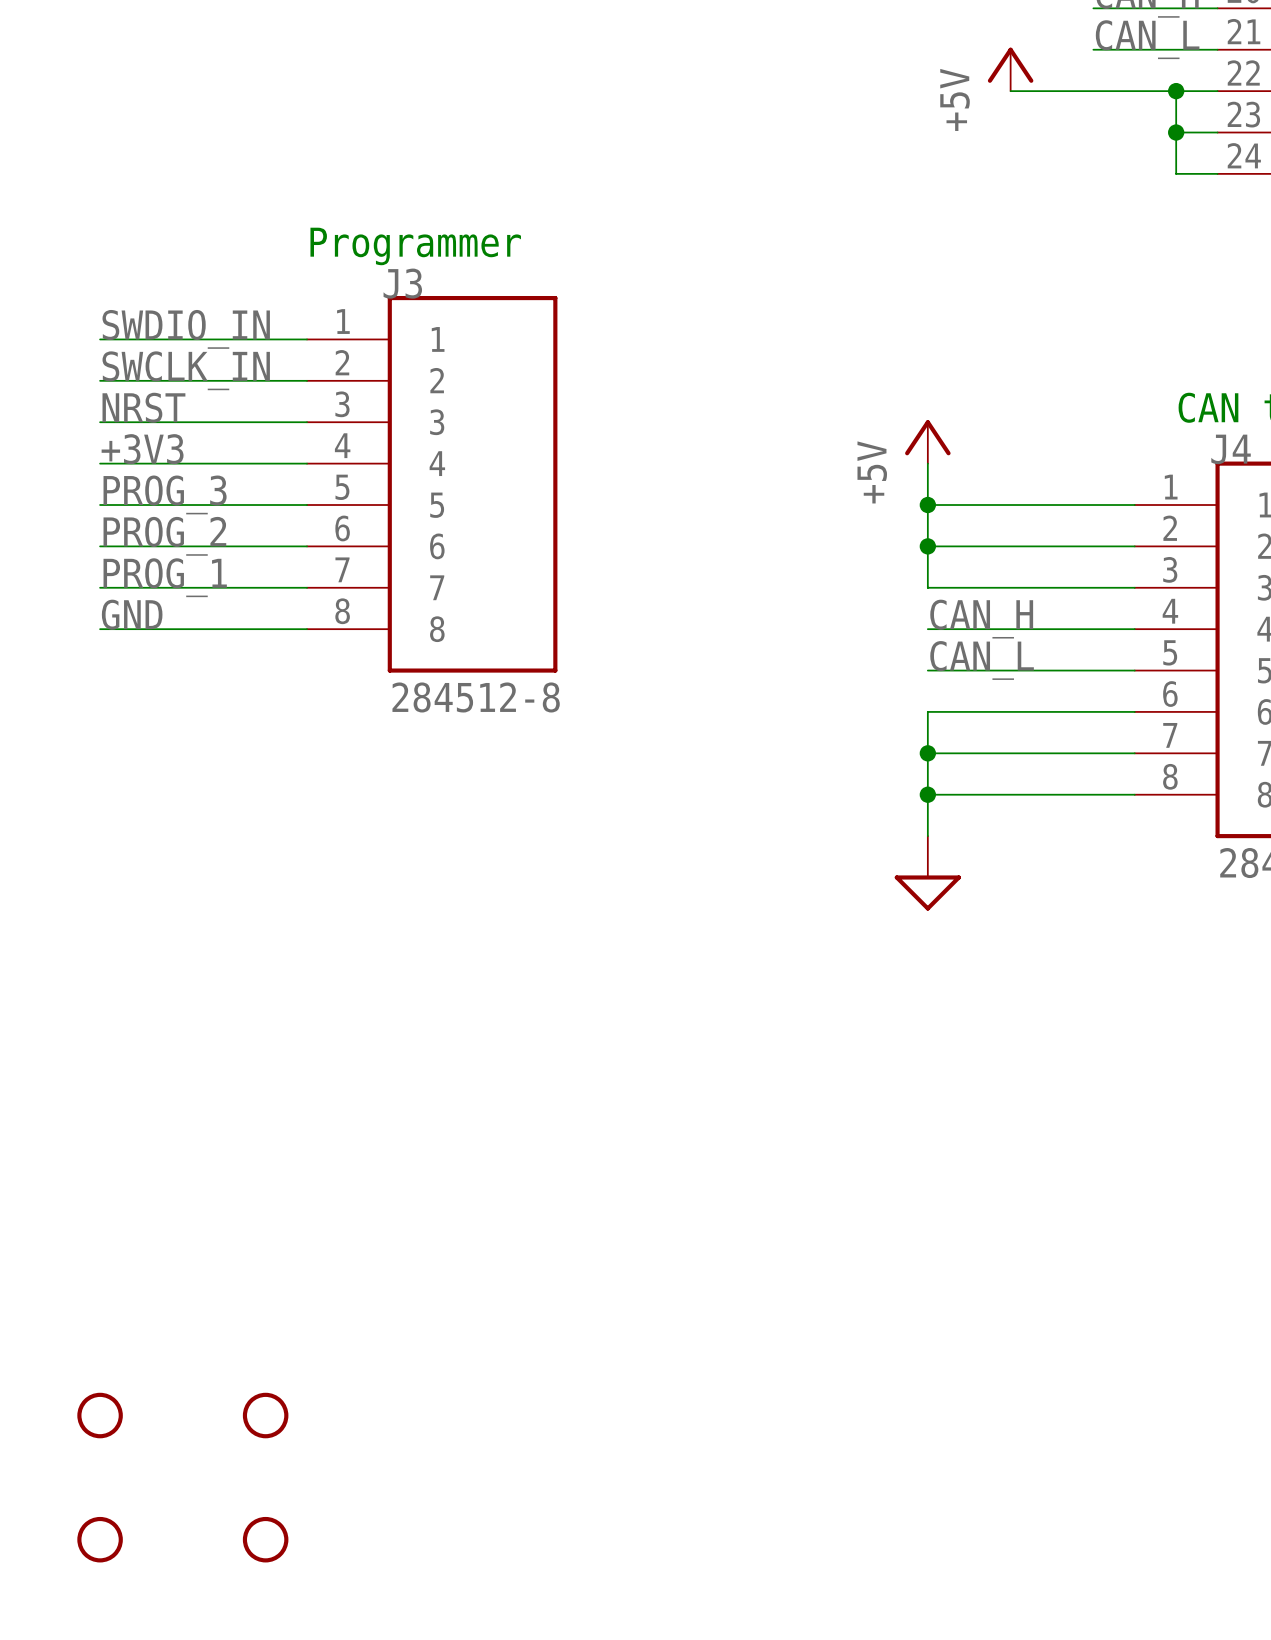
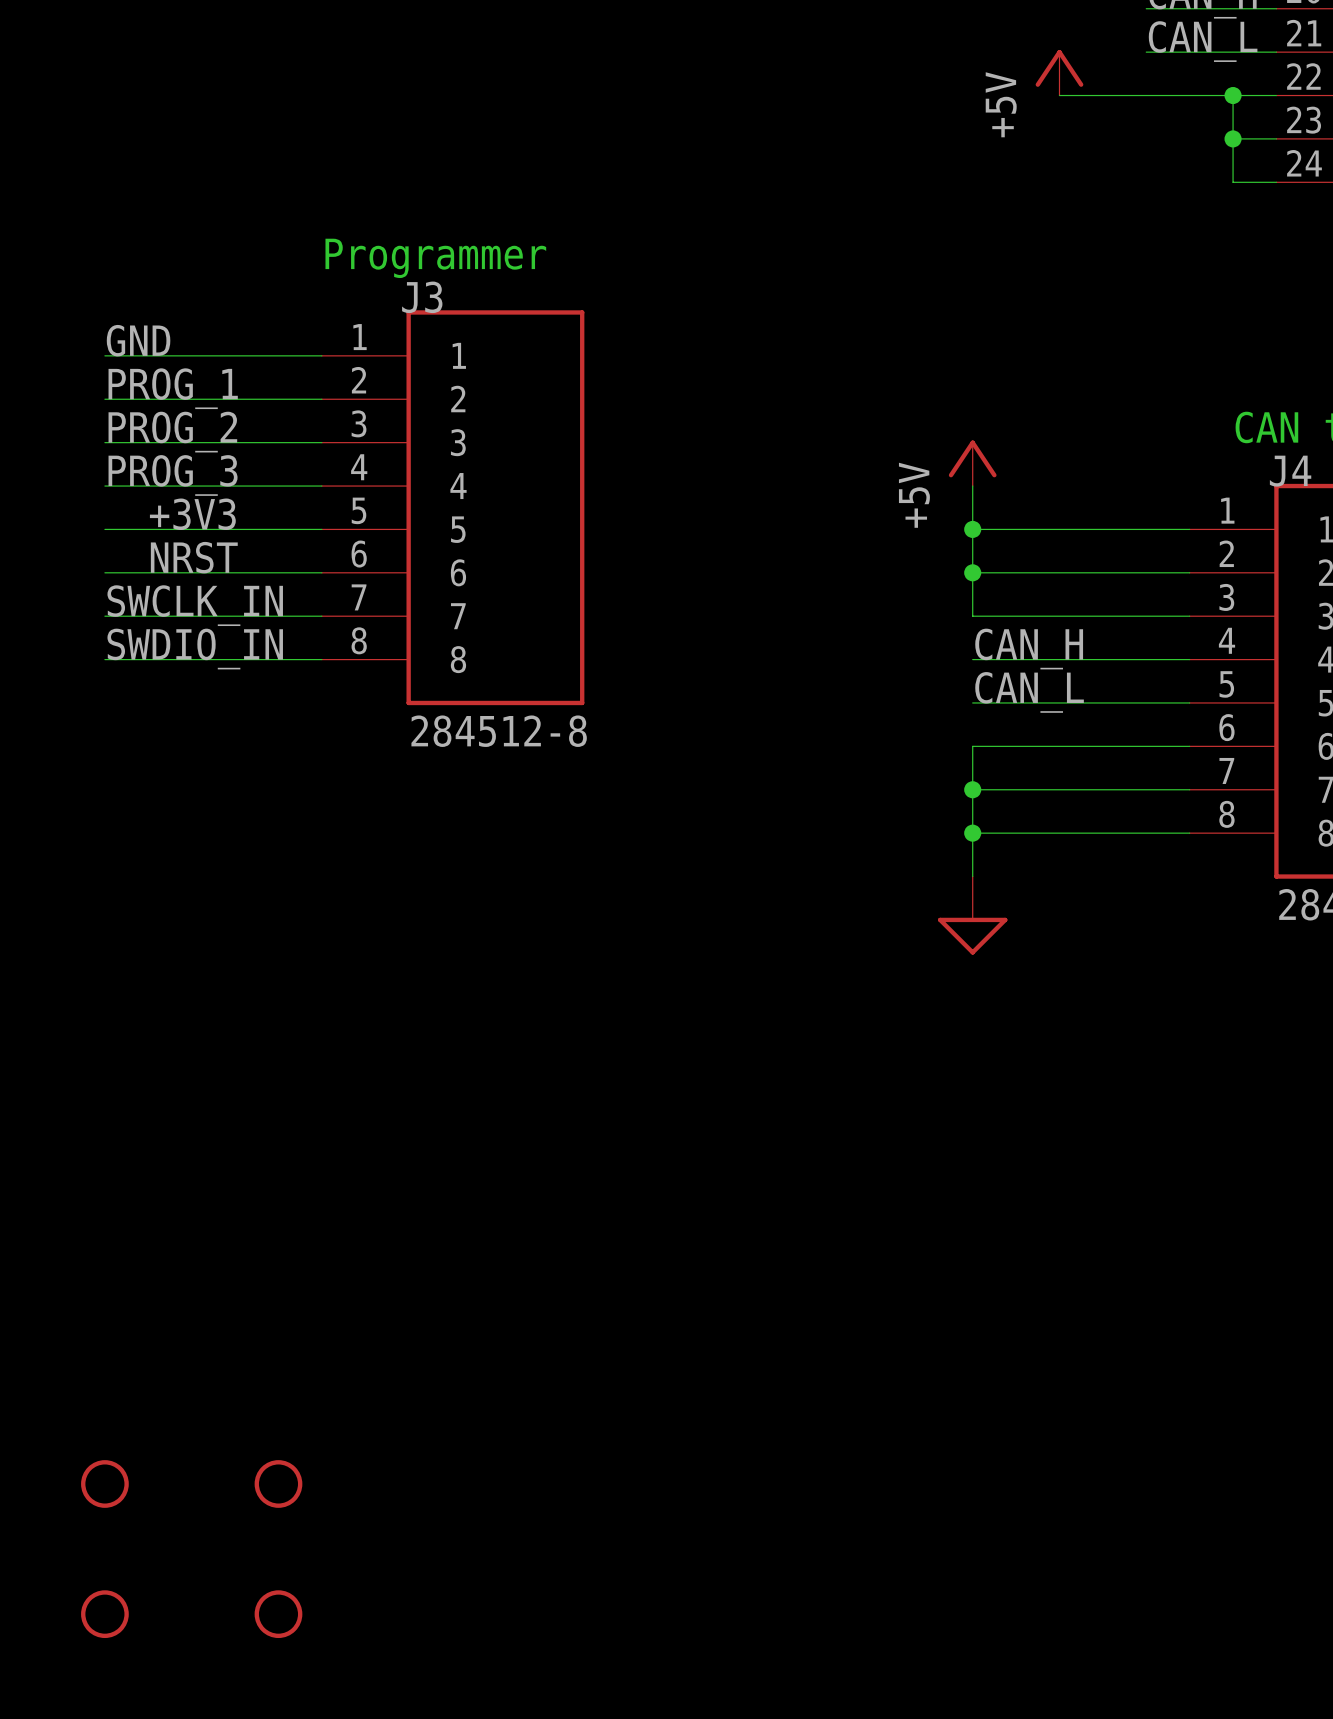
label: SWDIO_IN (186, 329) -> GND (138, 340)
label: SWCLK_IN (186, 370) -> PROG_1 (173, 388)
label: NRST (143, 407) -> PROG_2 (172, 432)
label: +3V3 (142, 449) -> PROG_3 (173, 475)
label: none -> +3V3 (192, 514)
label: PROG_3 (165, 494) -> none
label: none -> NRST (194, 557)
label: PROG_2 (164, 536) -> none
label: PROG_1 (165, 577) -> SWCLK_IN (195, 605)
label: GND (132, 614) -> SWDIO_IN (195, 649)

